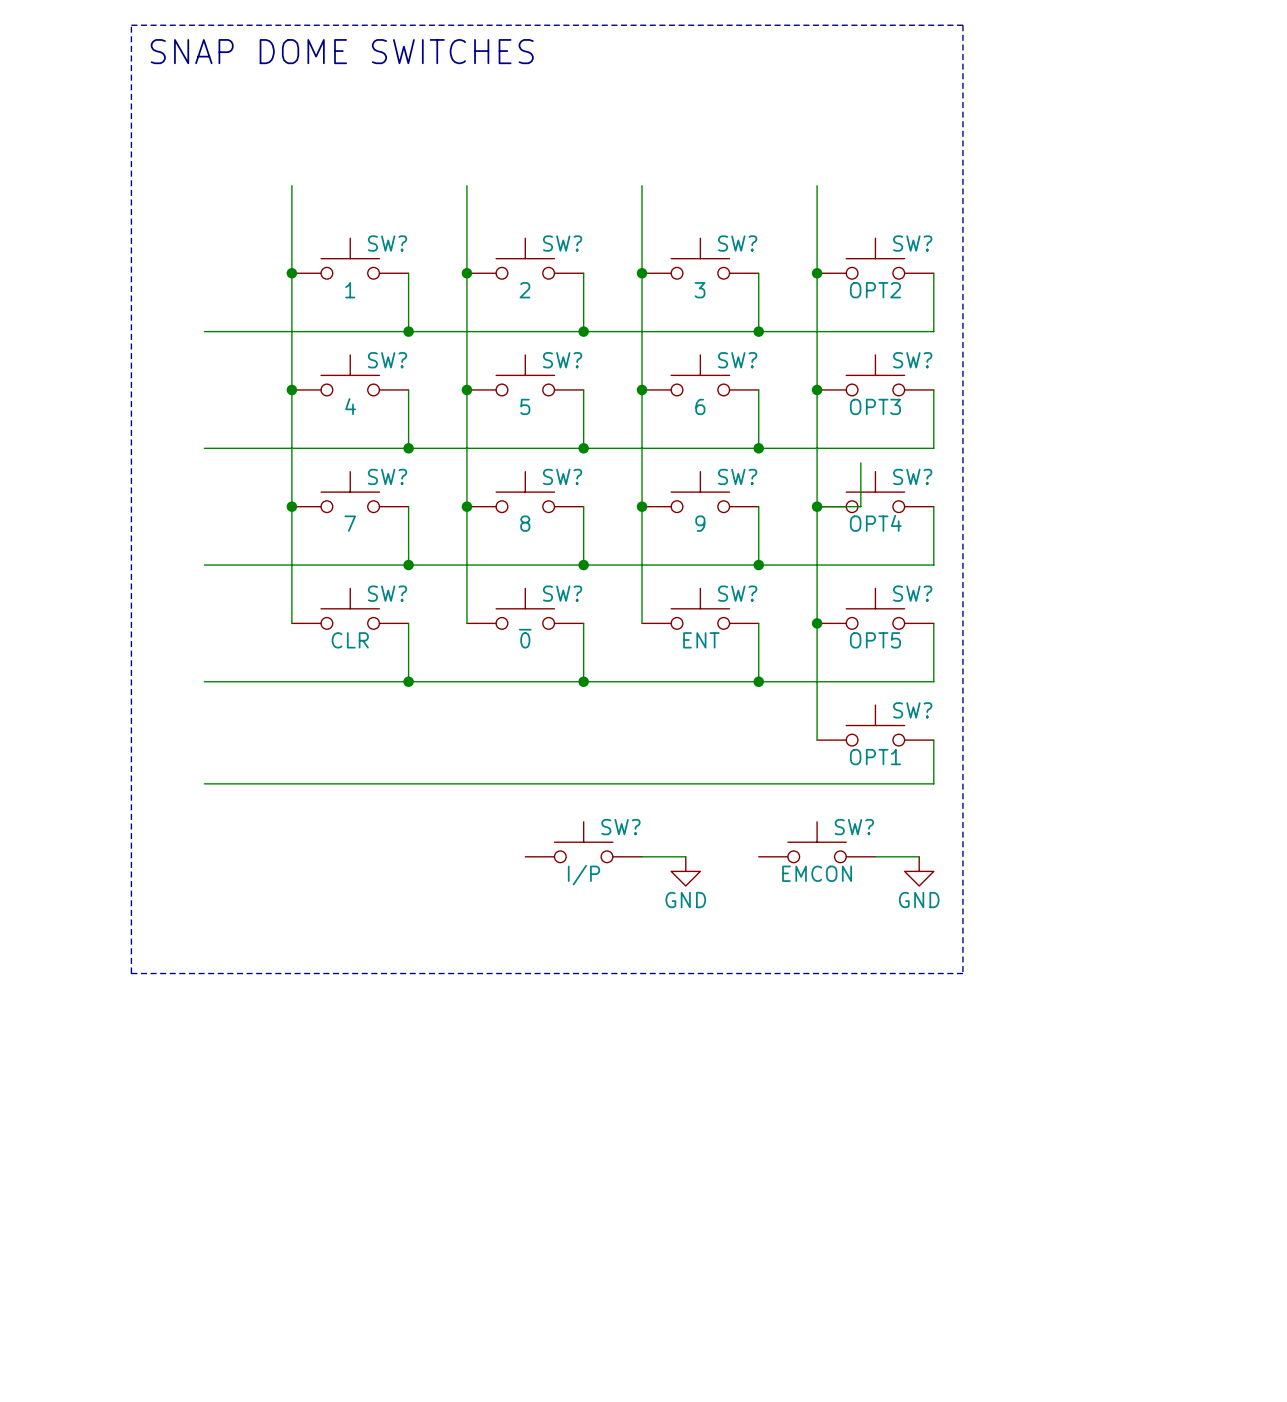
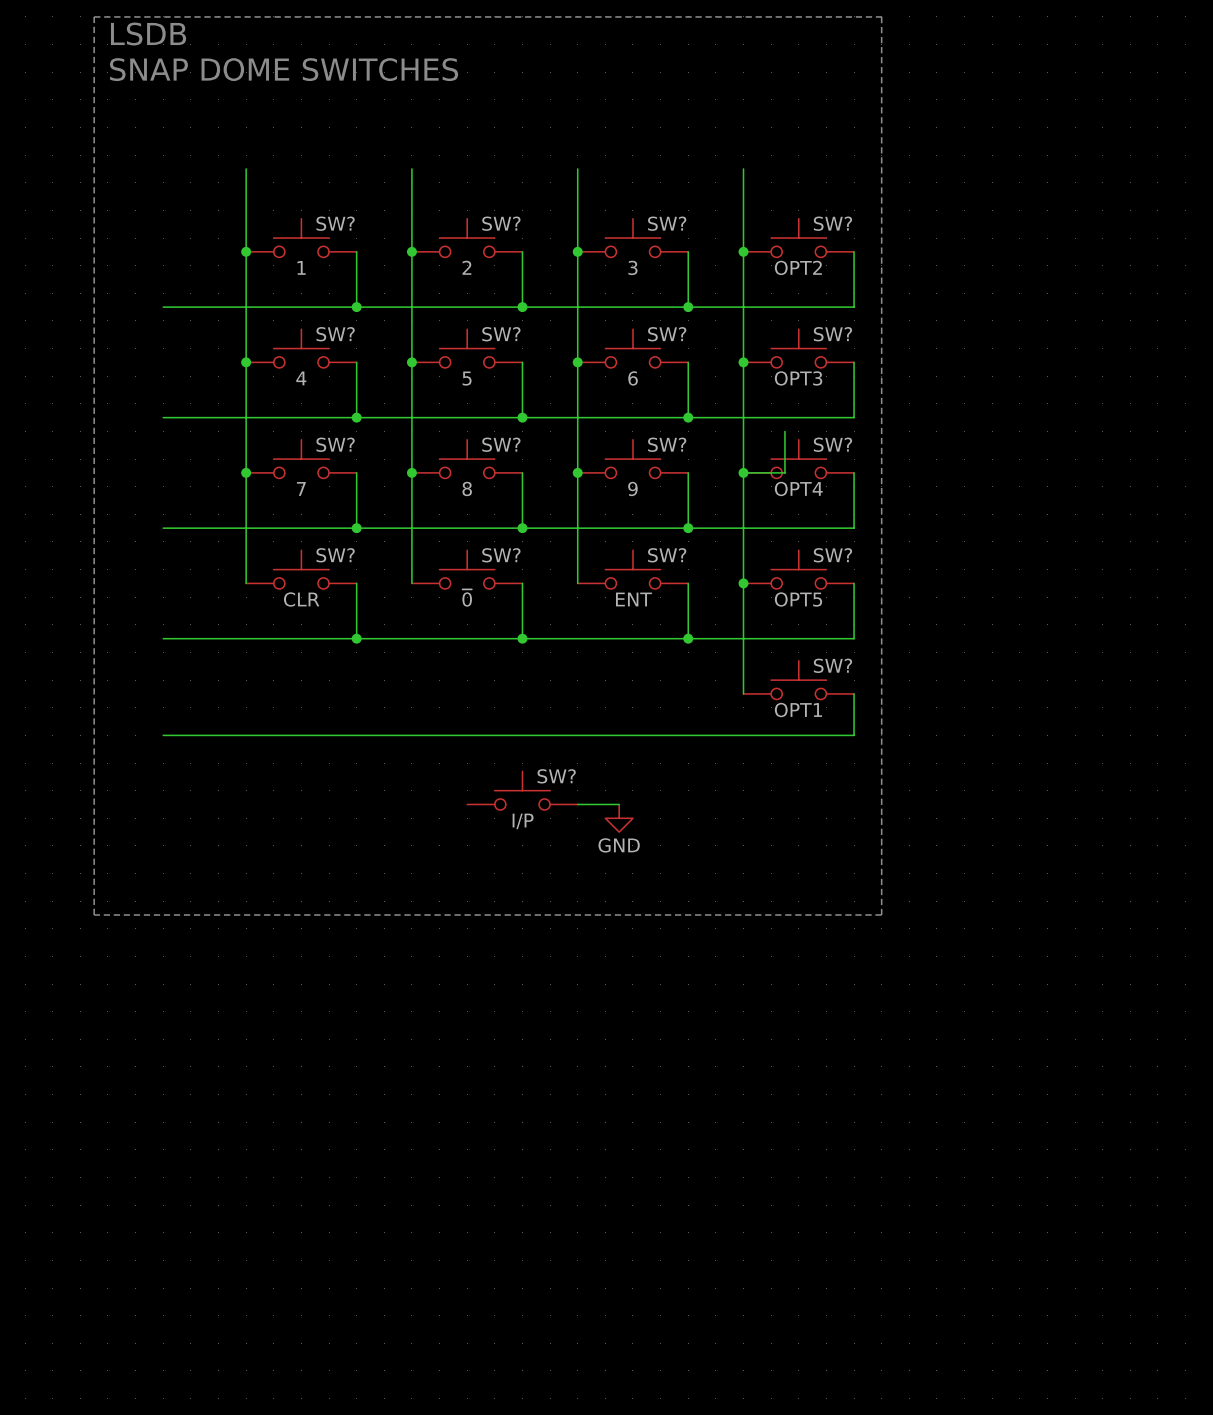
text: SNAP DOME SWITCHES (342, 51) -> LSDB (148, 34)
text: none -> SNAP DOME SWITCHES (284, 69)
SW?: EMCON (817, 842) -> none
wire: (875, 856) (919, 856) -> none
power symbol: GND (919, 871) -> none

